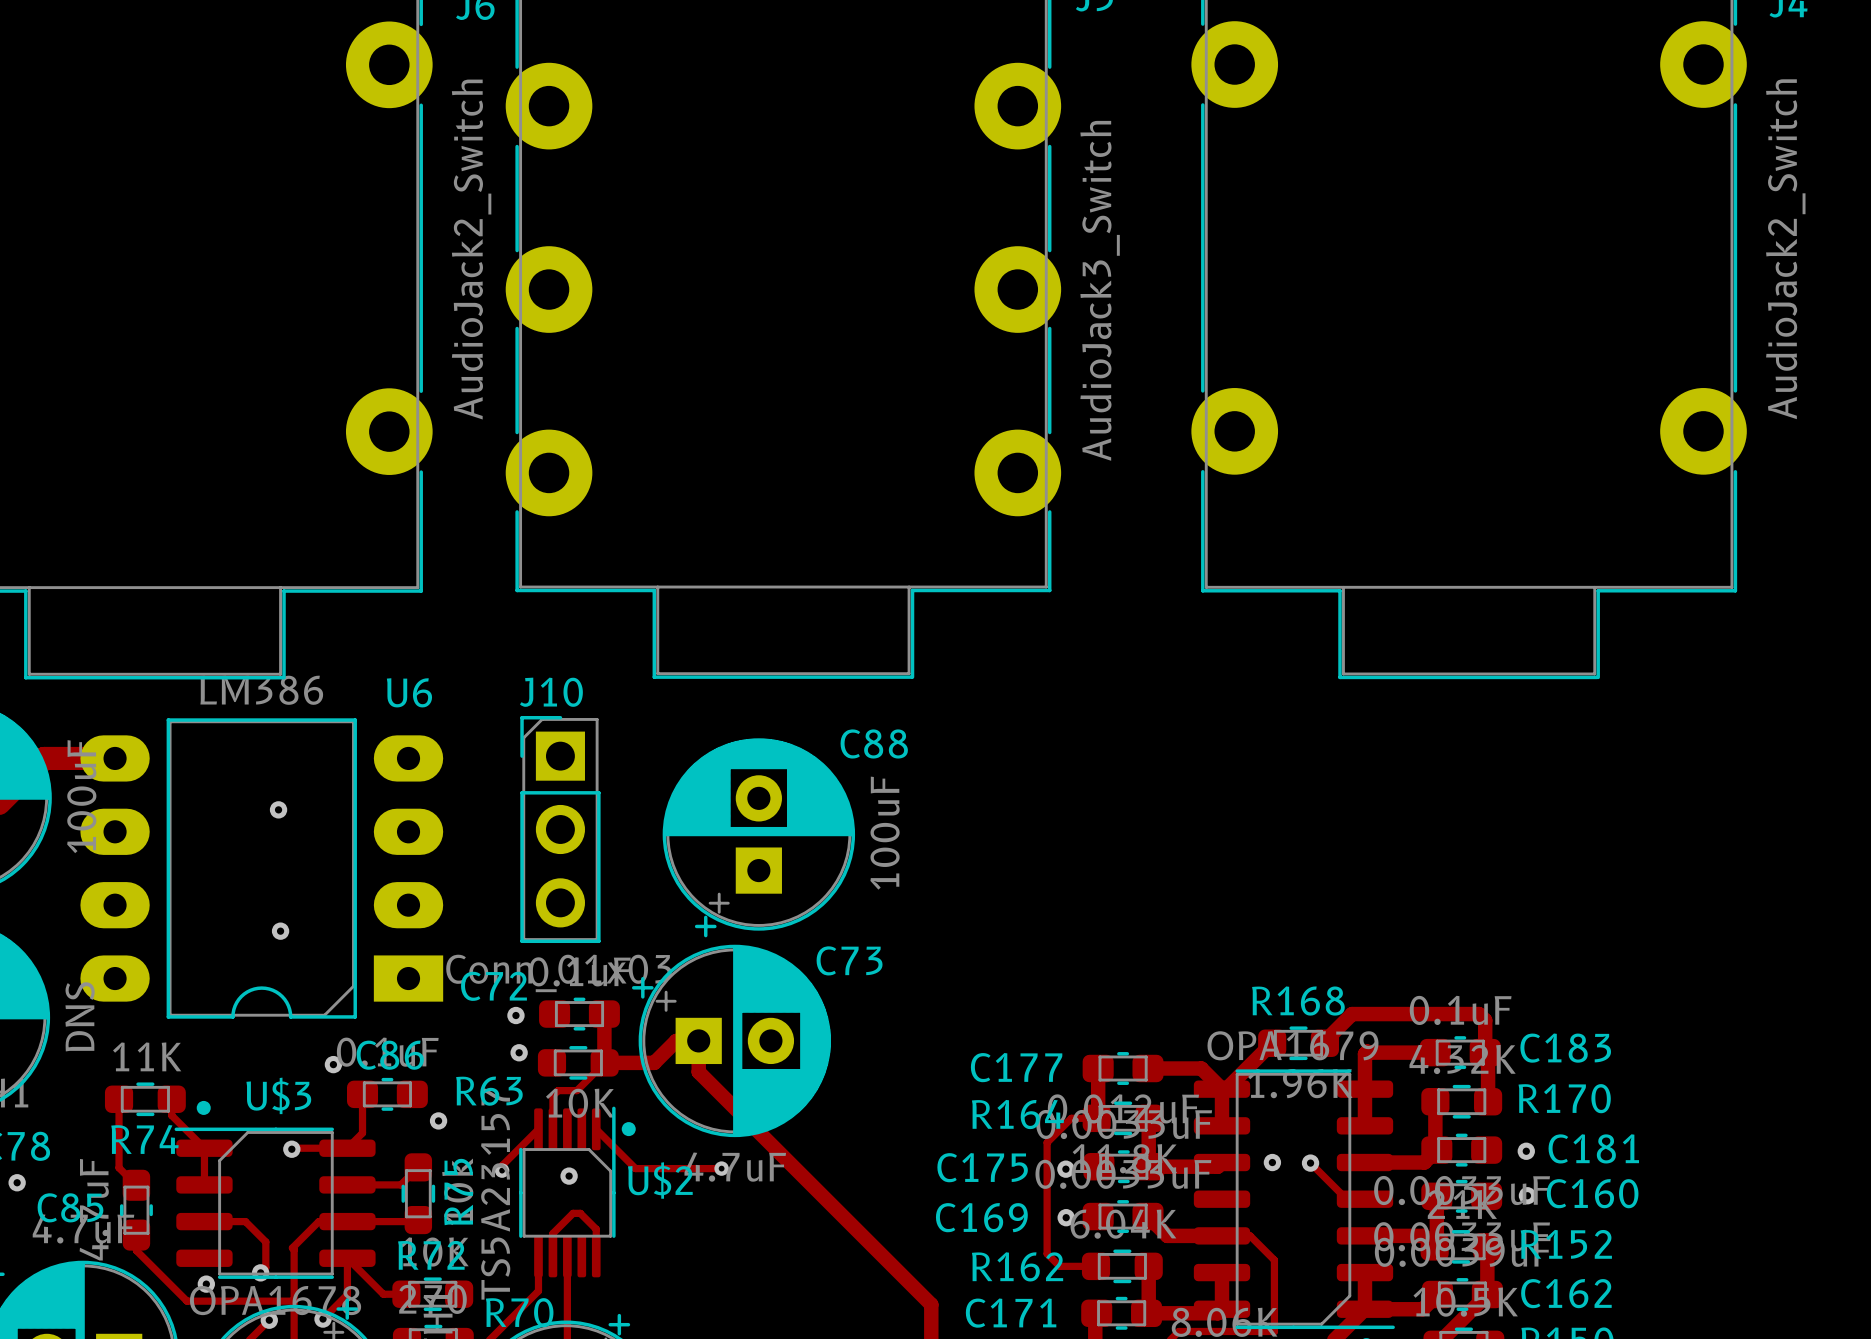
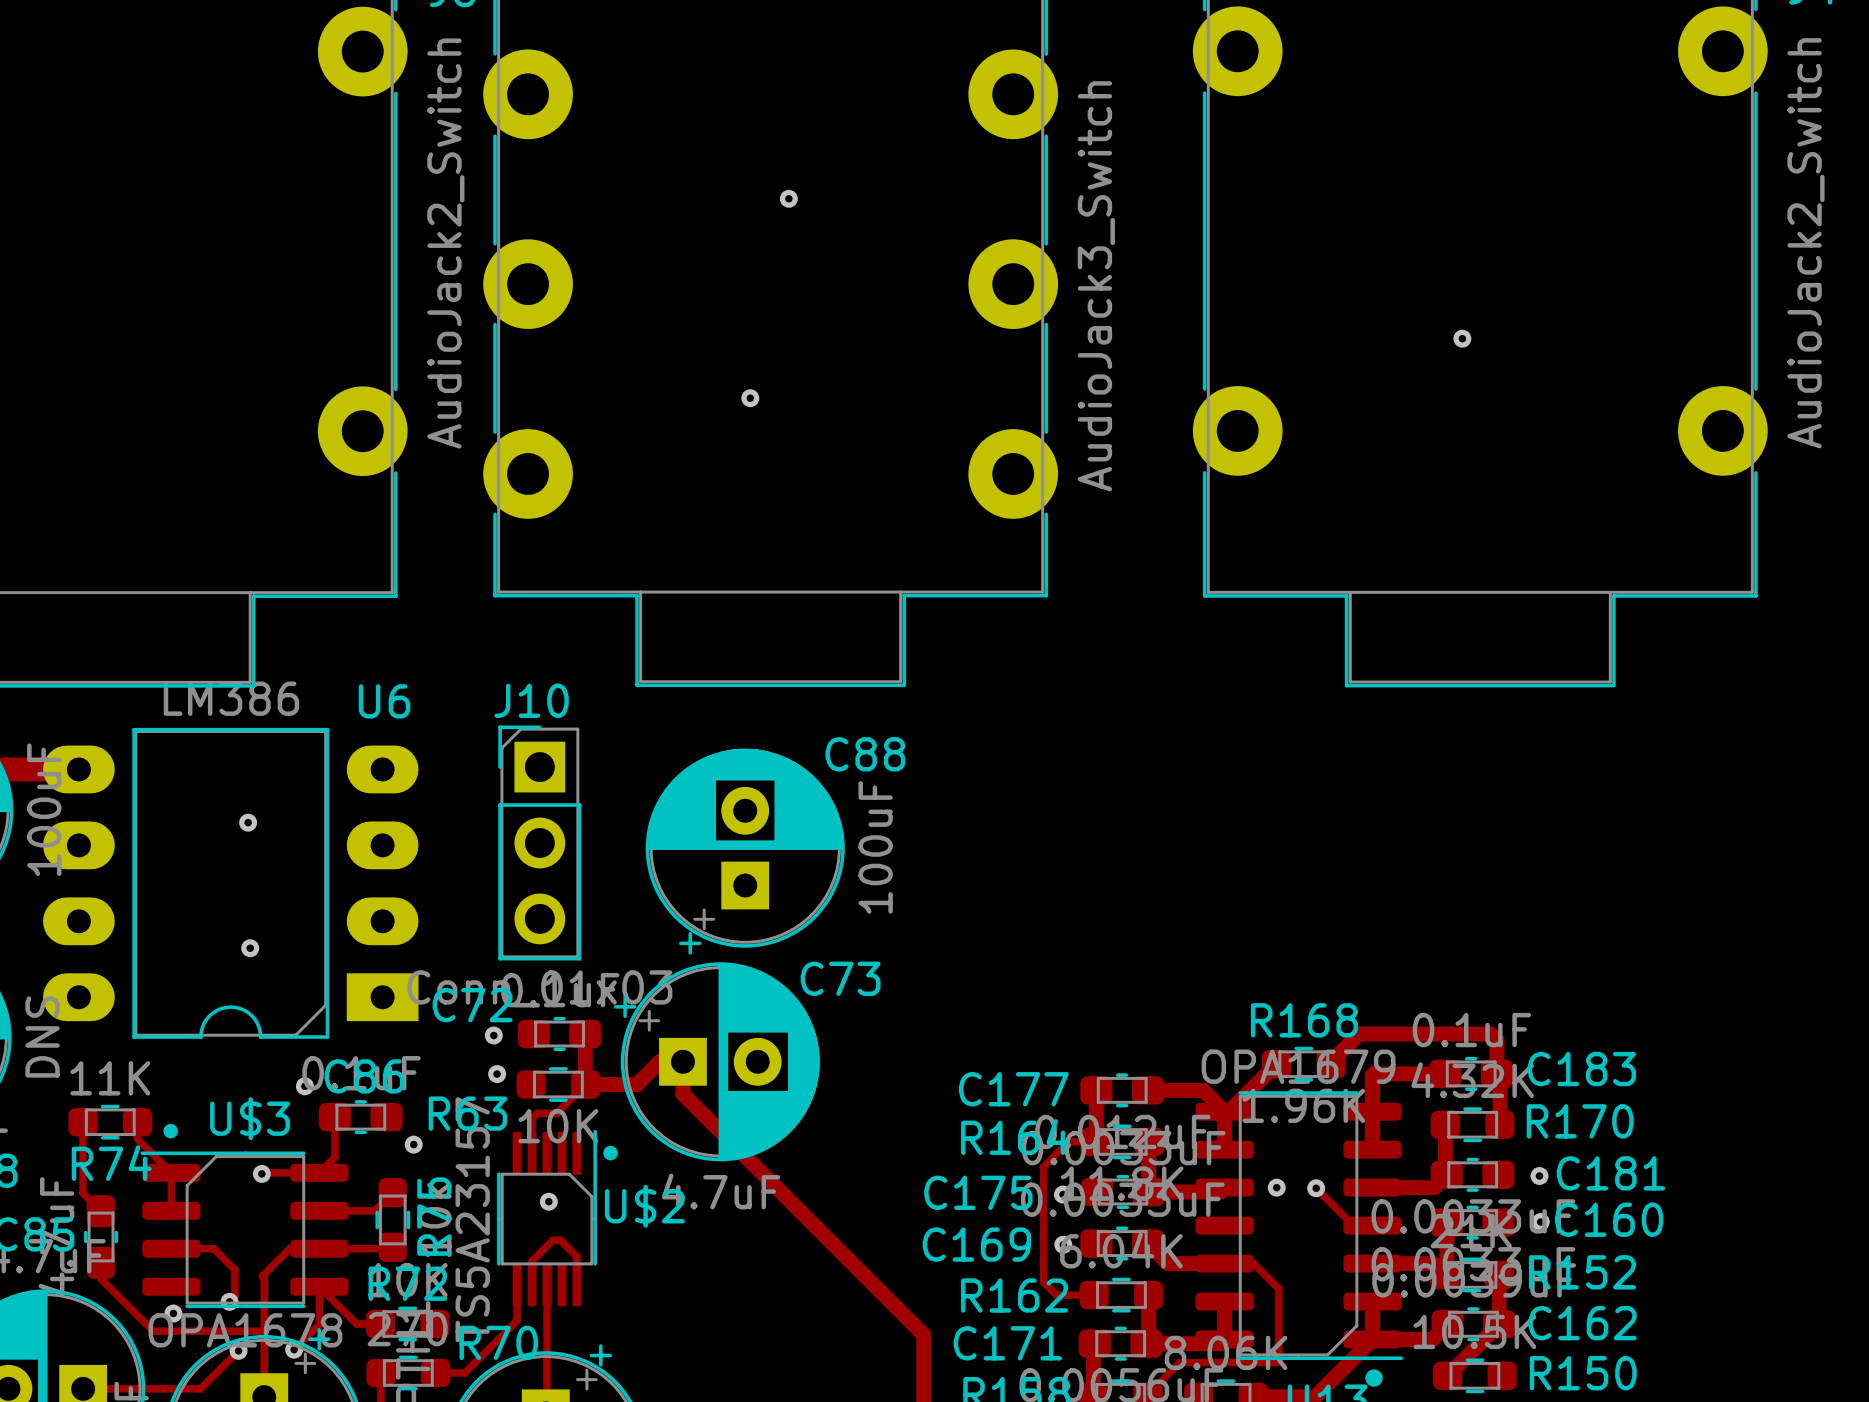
via: none -> (788, 198)
via: none -> (1462, 338)
via: none -> (750, 398)
track: (538, 1129) (502, 1165) (502, 1170) -> none
track: (596, 1129) (635, 1168) (721, 1168) -> none
via: (721, 1168) -> none
via: (502, 1170) -> none

